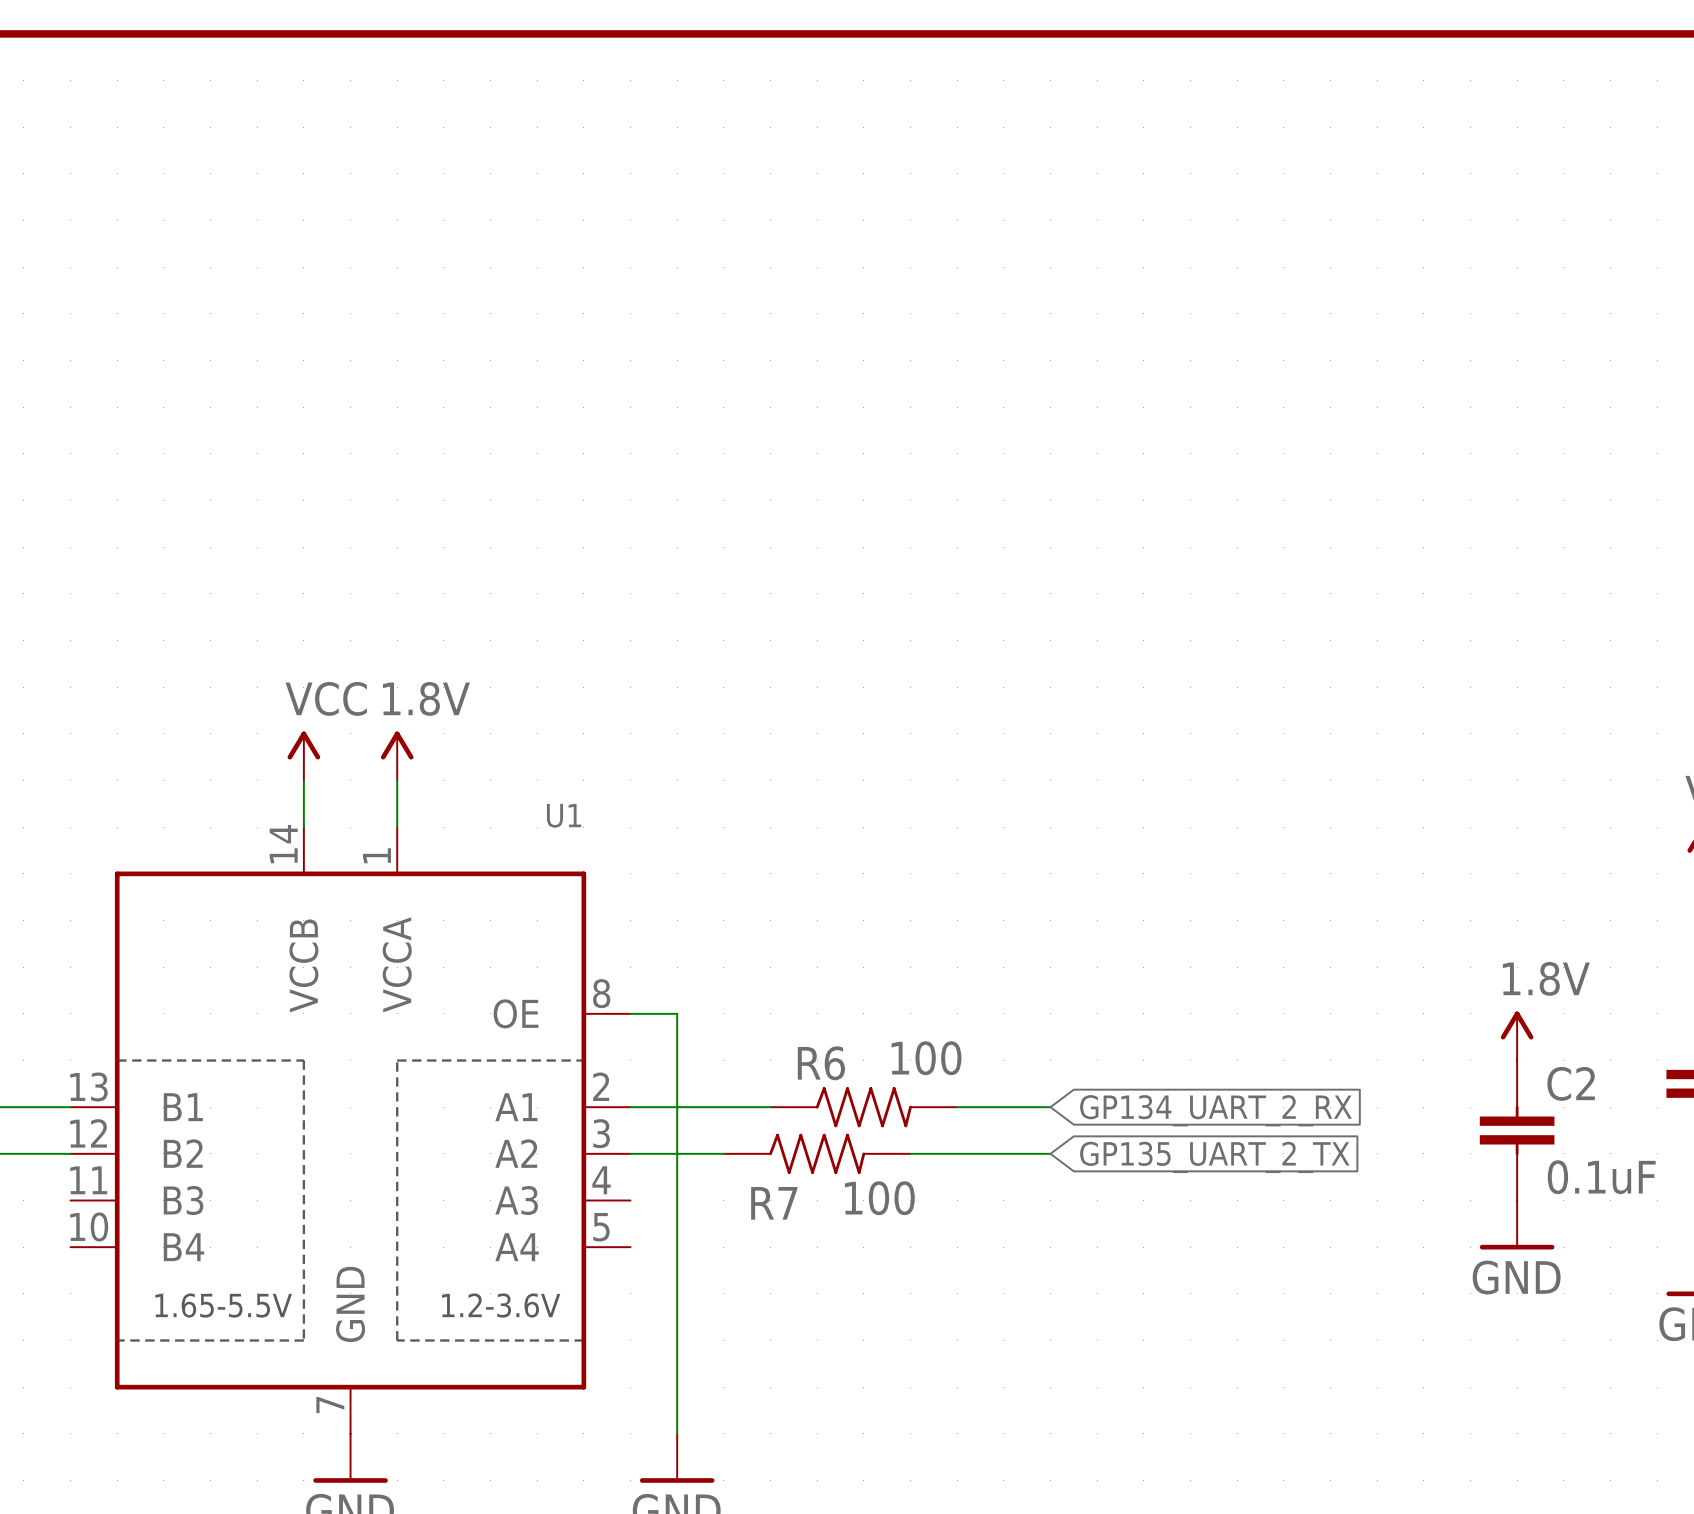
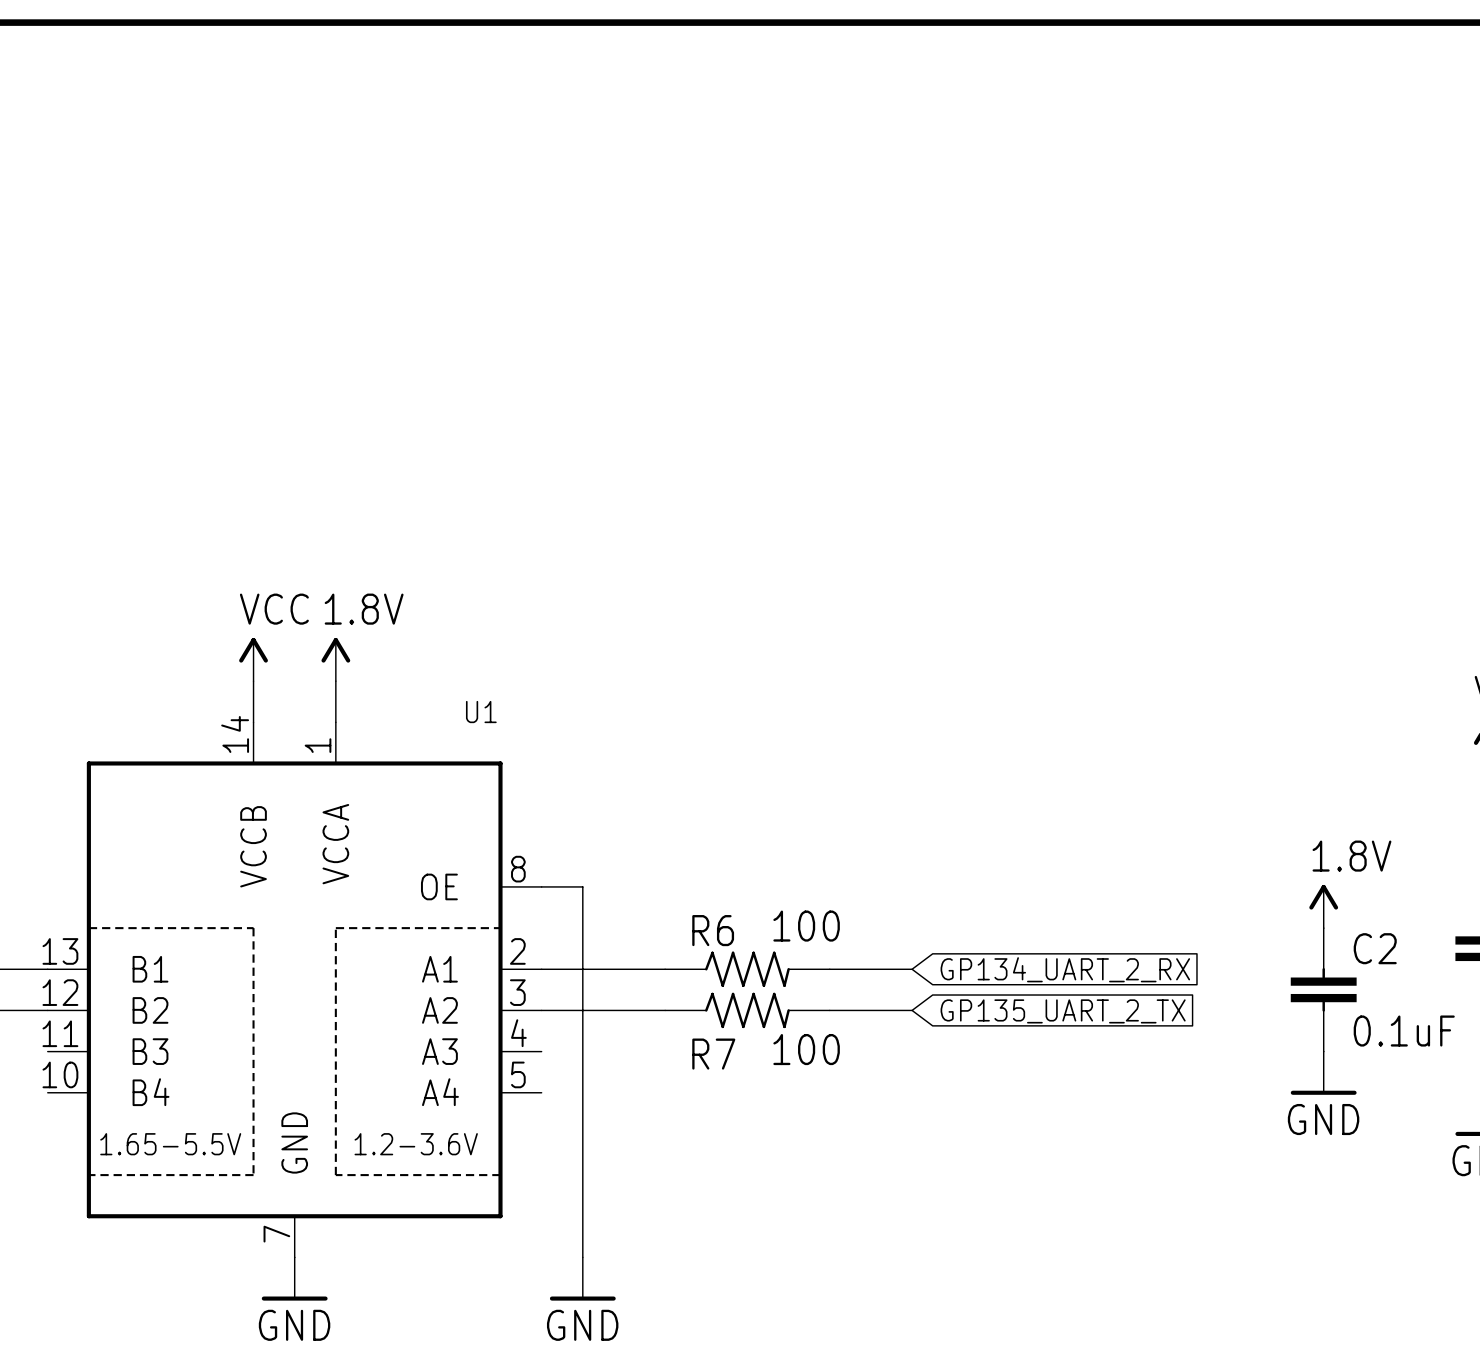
R7 position: (817, 1153) -> (747, 1010)

